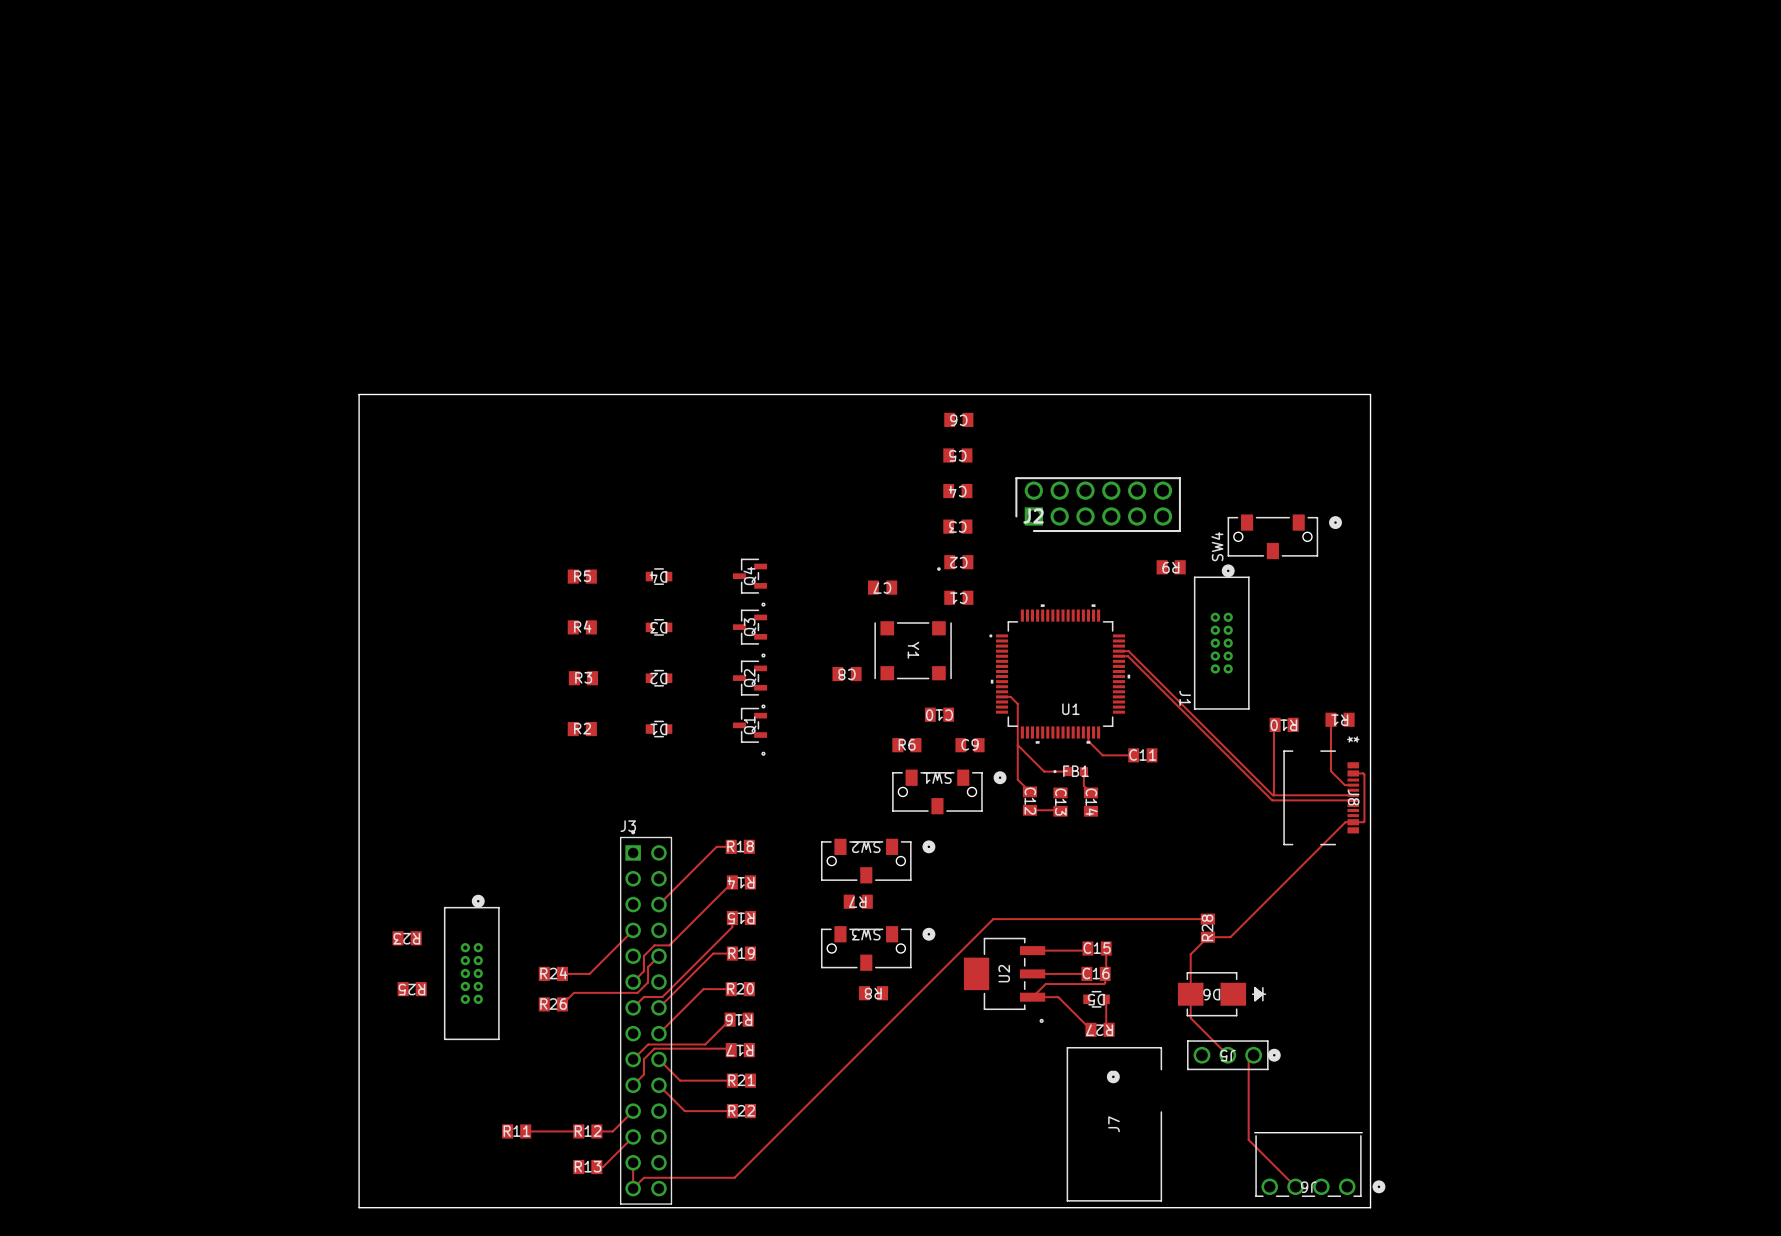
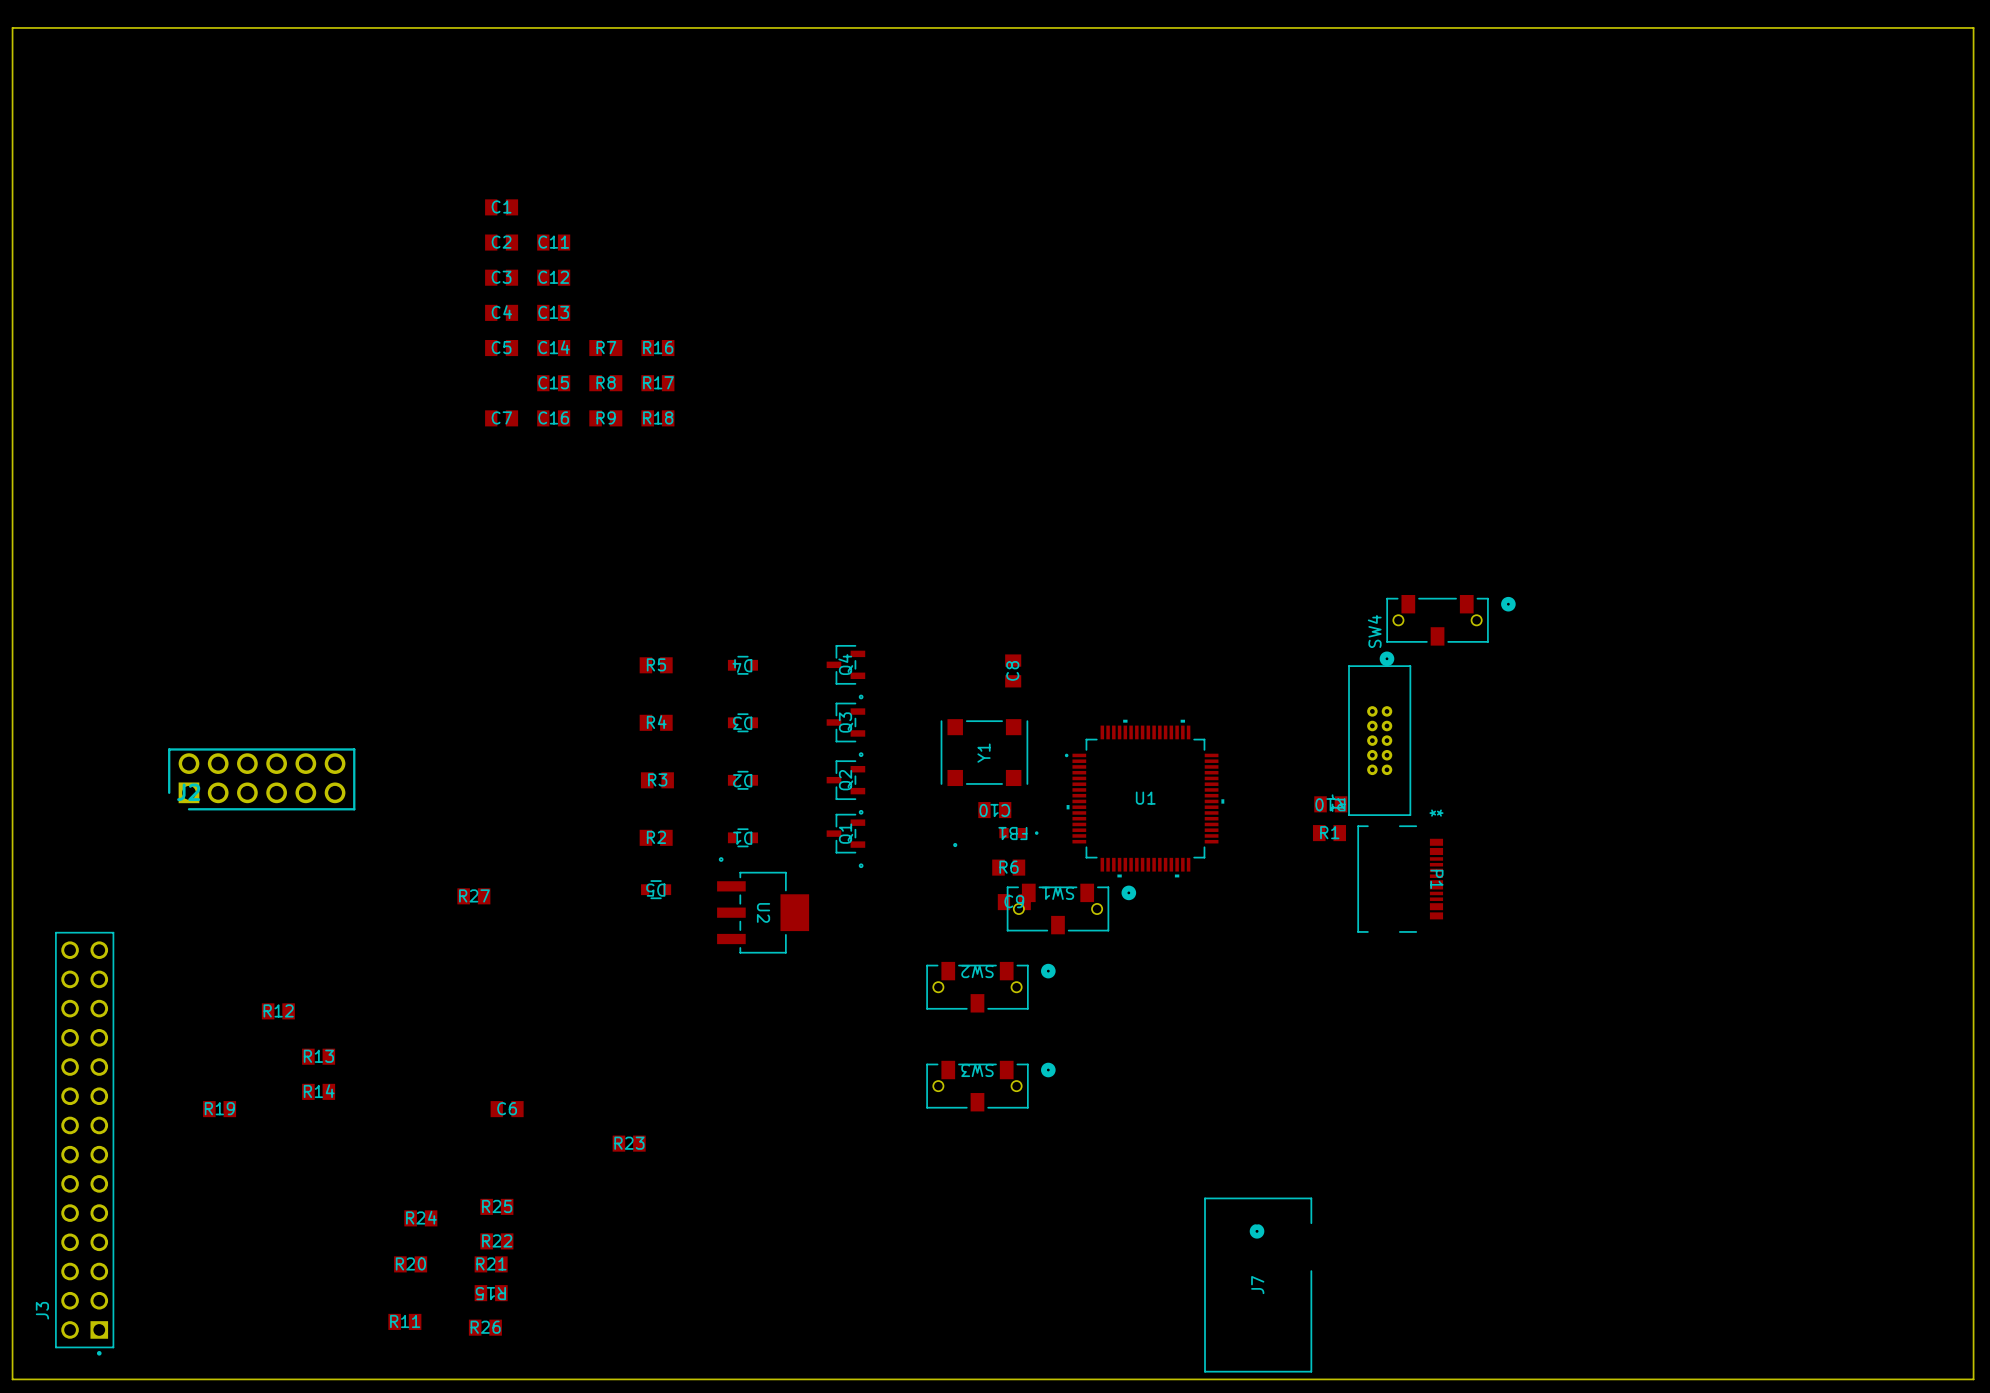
C6 position: (958, 419) -> (507, 1109)
C6 name rotation: 0° (958, 420) -> 180° (507, 1108)
C5 position: (957, 455) -> (501, 348)
C5 name rotation: 0° (957, 455) -> 180° (501, 347)
C4 position: (957, 491) -> (501, 312)
C4 name rotation: 0° (957, 491) -> 180° (501, 312)
J2 position: (1098, 504) -> (261, 779)
C3 position: (957, 526) -> (501, 277)
C3 name rotation: 0° (957, 527) -> 180° (501, 277)
C2 position: (958, 562) -> (501, 242)
C2 name rotation: 0° (958, 562) -> 180° (501, 242)
R9 name rotation: 0° (1170, 567) -> 180° (606, 417)
R9 position: (1171, 567) -> (605, 418)
C7 position: (882, 587) -> (501, 418)
C7 name rotation: 0° (882, 588) -> 180° (501, 417)
C1 position: (958, 597) -> (501, 207)
C1 name rotation: 0° (958, 598) -> 180° (501, 206)
Y1 rotation: 0° (913, 623) -> 180° (984, 783)
Y1 position: (913, 623) -> (984, 783)
track: (1118, 651) (1128, 651) (1272, 795) (1353, 795) -> none
track: (1118, 656) (1128, 656) (1272, 800) (1353, 800) -> none
C8 rotation: 0° (847, 674) -> 90° clockwise (1013, 670)
C8 position: (847, 674) -> (1013, 670)
U1 position: (1059, 674) -> (1144, 798)
track: (1002, 696) (1010, 696) (1017, 704) (1017, 779) (1029, 791) -> none
U1 name position: U1 (1070, 709) -> U1 (1145, 798)
C10 position: (939, 714) -> (994, 810)
track: (1330, 719) (1330, 771) (1344, 785) (1353, 785) -> none
R1 position: (1340, 719) -> (1329, 833)
R1 name rotation: 0° (1339, 720) -> 180° (1329, 832)
track: (1273, 723) (1273, 795) -> none
R10 position: (1284, 724) -> (1330, 804)
track: (1088, 732) (1088, 741) (1102, 755) (1133, 755) -> none
R6 position: (906, 745) -> (1008, 867)
C9 position: (970, 745) -> (1014, 902)
track: (1017, 745) (1044, 771) (1067, 771) -> none
C11 position: (1142, 755) -> (553, 242)
P1: none -> (1400, 879)
FB1 rotation: 0° (1070, 771) -> 180° (1018, 833)
FB1 position: (1070, 771) -> (1018, 833)
track: (1083, 771) (1083, 785) (1090, 792) -> none
track: (1353, 773) (1364, 774) (1364, 821) (1345, 822) (1230, 937) (1207, 937) (1190, 954) (1190, 1018) (1227, 1055) -> none
J8: (1321, 797) -> none
C12 rotation: 0° (1029, 801) -> 90° clockwise (553, 277)
C12 position: (1029, 801) -> (553, 277)
C13 rotation: 0° (1060, 802) -> 90° clockwise (553, 312)
C13 position: (1060, 802) -> (553, 312)
C14 rotation: 0° (1090, 802) -> 90° clockwise (553, 348)
C14 position: (1090, 802) -> (553, 348)
track: (1029, 810) (1060, 811) -> none
J3 name position: J3 (628, 826) -> J3 (42, 1310)
track: (731, 846) (716, 846) (658, 904) -> none
R18 position: (740, 846) -> (657, 418)
track: (732, 882) (669, 945) (654, 945) (643, 955) (643, 971) (633, 982) -> none
R14 position: (741, 882) -> (318, 1091)
R14 name rotation: 0° (740, 883) -> 180° (319, 1091)
R7 position: (858, 901) -> (605, 348)
R7 name rotation: 0° (857, 902) -> 180° (606, 347)
track: (732, 917) (732, 927) (662, 997) (643, 997) (633, 1007) -> none
R15 position: (741, 917) -> (491, 1293)
track: (1207, 919) (993, 919) (734, 1177) (643, 1177) (633, 1188) (633, 1162) -> none
R28: (1207, 928) -> none
track: (633, 930) (589, 973) (562, 973) -> none
R23 name rotation: 0° (406, 938) -> 180° (629, 1143)
R23 position: (407, 938) -> (629, 1143)
track: (1087, 948) (1085, 950) (1032, 950) -> none
C15 position: (1097, 948) -> (553, 383)
track: (1106, 948) (1104, 984) (1045, 984) (1032, 997) (1058, 997) (1090, 1029) -> none
track: (732, 953) (713, 953) (658, 1007) -> none
R19 position: (741, 953) -> (219, 1109)
track: (658, 956) (648, 967) (648, 982) (637, 992) (573, 992) (562, 1004) -> none
part: (471, 967) -> none
R24 position: (553, 973) -> (420, 1218)
track: (1032, 973) (1086, 973) -> none
C16 position: (1096, 973) -> (553, 418)
U2 rotation: 0° (1004, 980) -> 180° (763, 905)
U2 position: (1004, 980) -> (763, 905)
R25 name rotation: 0° (411, 989) -> 180° (497, 1206)
R25 position: (412, 989) -> (496, 1206)
track: (731, 989) (703, 989) (658, 1033) -> none
R20 position: (740, 989) -> (410, 1264)
R8 position: (873, 993) -> (605, 383)
R8 name rotation: 0° (873, 993) -> 180° (606, 382)
D6: (1222, 994) -> none
D5 position: (1096, 999) -> (656, 889)
track: (1106, 999) (1106, 1026) (1109, 1029) -> none
R26 position: (553, 1004) -> (485, 1327)
J3 rotation: 0° (646, 1017) -> 180° (84, 1143)
J3 position: (646, 1017) -> (84, 1143)
track: (730, 1019) (705, 1044) (648, 1044) (633, 1059) -> none
R16 position: (739, 1019) -> (657, 348)
R16 name rotation: 0° (738, 1020) -> 180° (658, 347)
R27 position: (1100, 1029) -> (473, 896)
R27 name rotation: 0° (1099, 1030) -> 180° (474, 895)
track: (731, 1050) (654, 1048) (643, 1059) (643, 1074) (633, 1085) -> none
R17 name rotation: 0° (739, 1050) -> 180° (658, 382)
R17 position: (740, 1050) -> (657, 383)
J5: (1233, 1055) -> none
track: (1253, 1055) (1248, 1060) (1248, 1139) (1295, 1186) -> none
track: (658, 1059) (680, 1080) (732, 1080) -> none
R21 position: (741, 1080) -> (491, 1264)
track: (658, 1085) (684, 1111) (732, 1111) -> none
track: (633, 1111) (612, 1131) (596, 1131) -> none
R22 position: (741, 1111) -> (496, 1241)
R11 position: (516, 1131) -> (404, 1321)
track: (525, 1131) (578, 1131) -> none
R12 position: (587, 1131) -> (278, 1011)
track: (633, 1136) (603, 1167) (596, 1167) -> none
J6: (1320, 1164) -> none
R13 position: (587, 1167) -> (318, 1056)
board edge: (359, 1207) (359, 394) (1370, 394) (1370, 1207) -> (403, 1379) (12, 1379) (12, 27) (1973, 27) (1973, 1379) (1548, 1379)

